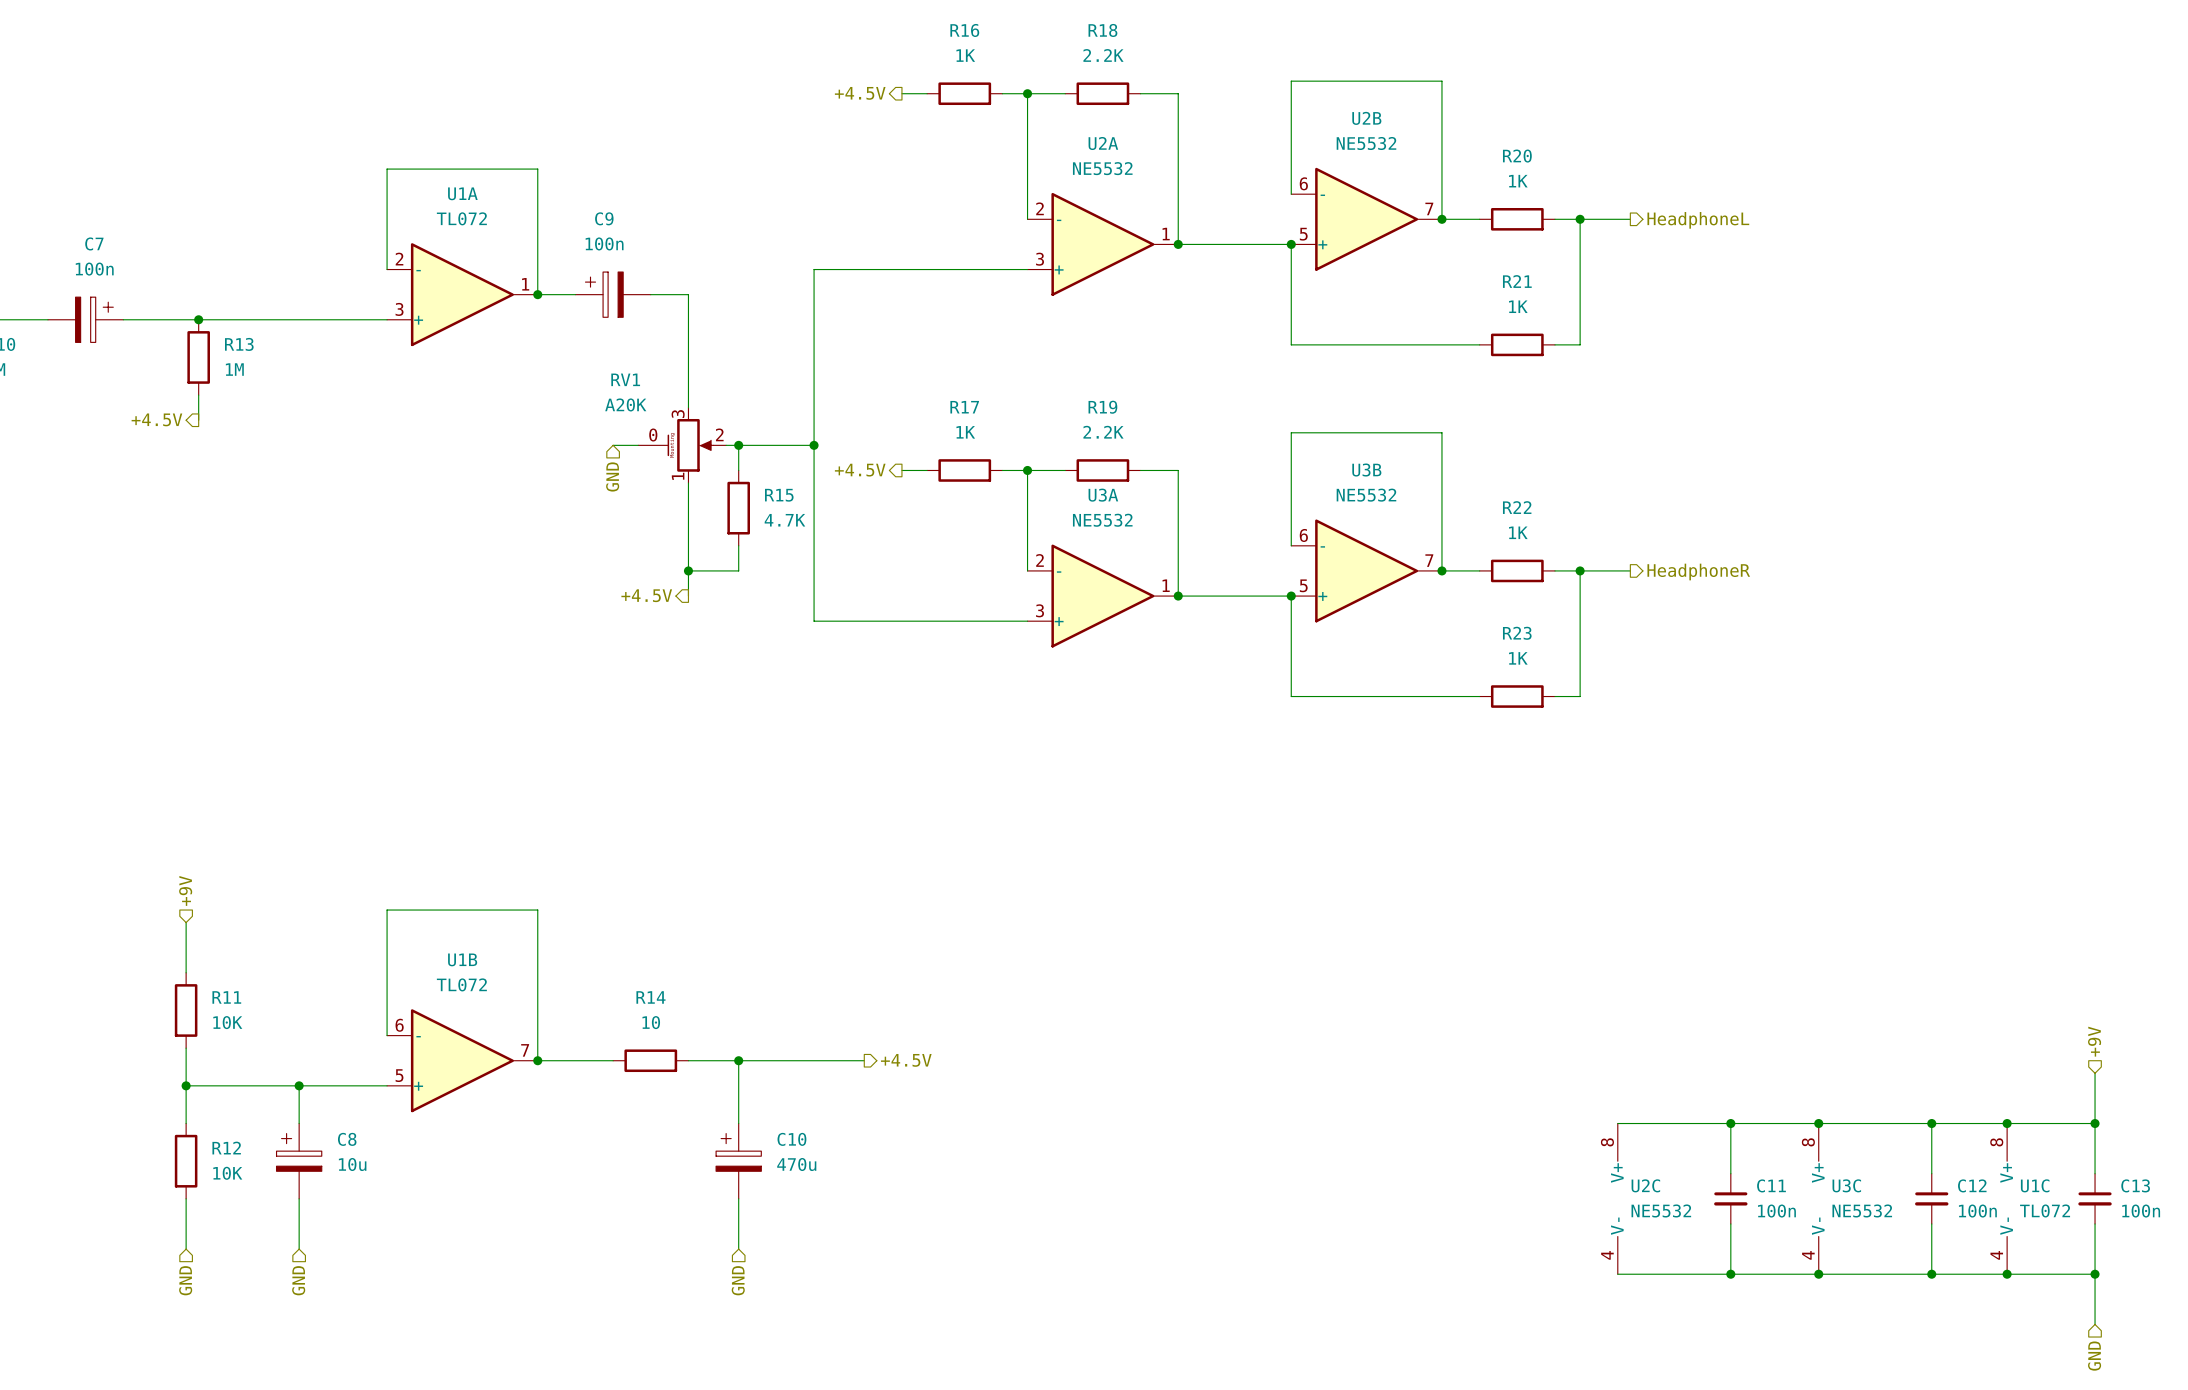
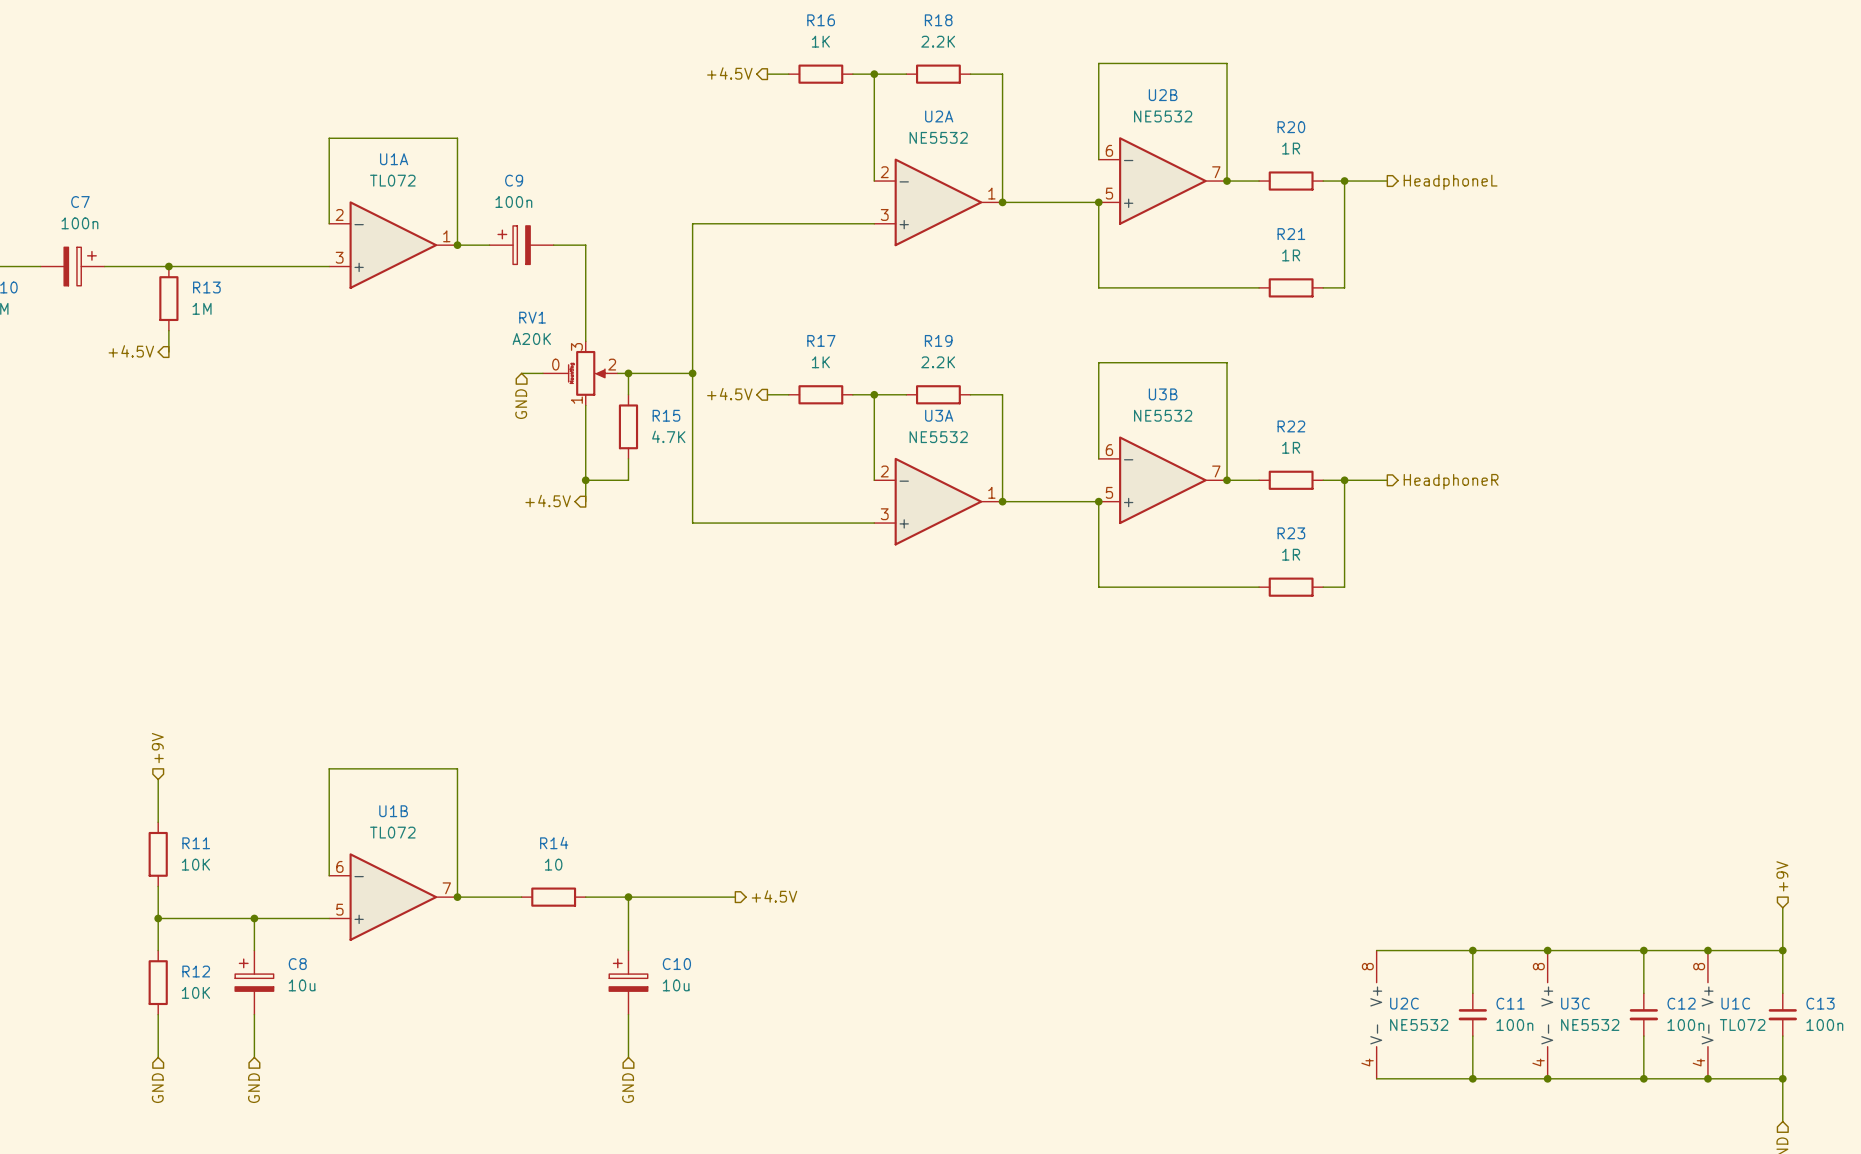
R20 value: 1K (1518, 181) -> 1R (1291, 148)
R21 value: 1K (1518, 306) -> 1R (1291, 255)
R22 value: 1K (1518, 532) -> 1R (1291, 447)
R23 value: 1K (1518, 658) -> 1R (1291, 554)
C10 value: 470u (796, 1164) -> 10u (676, 985)

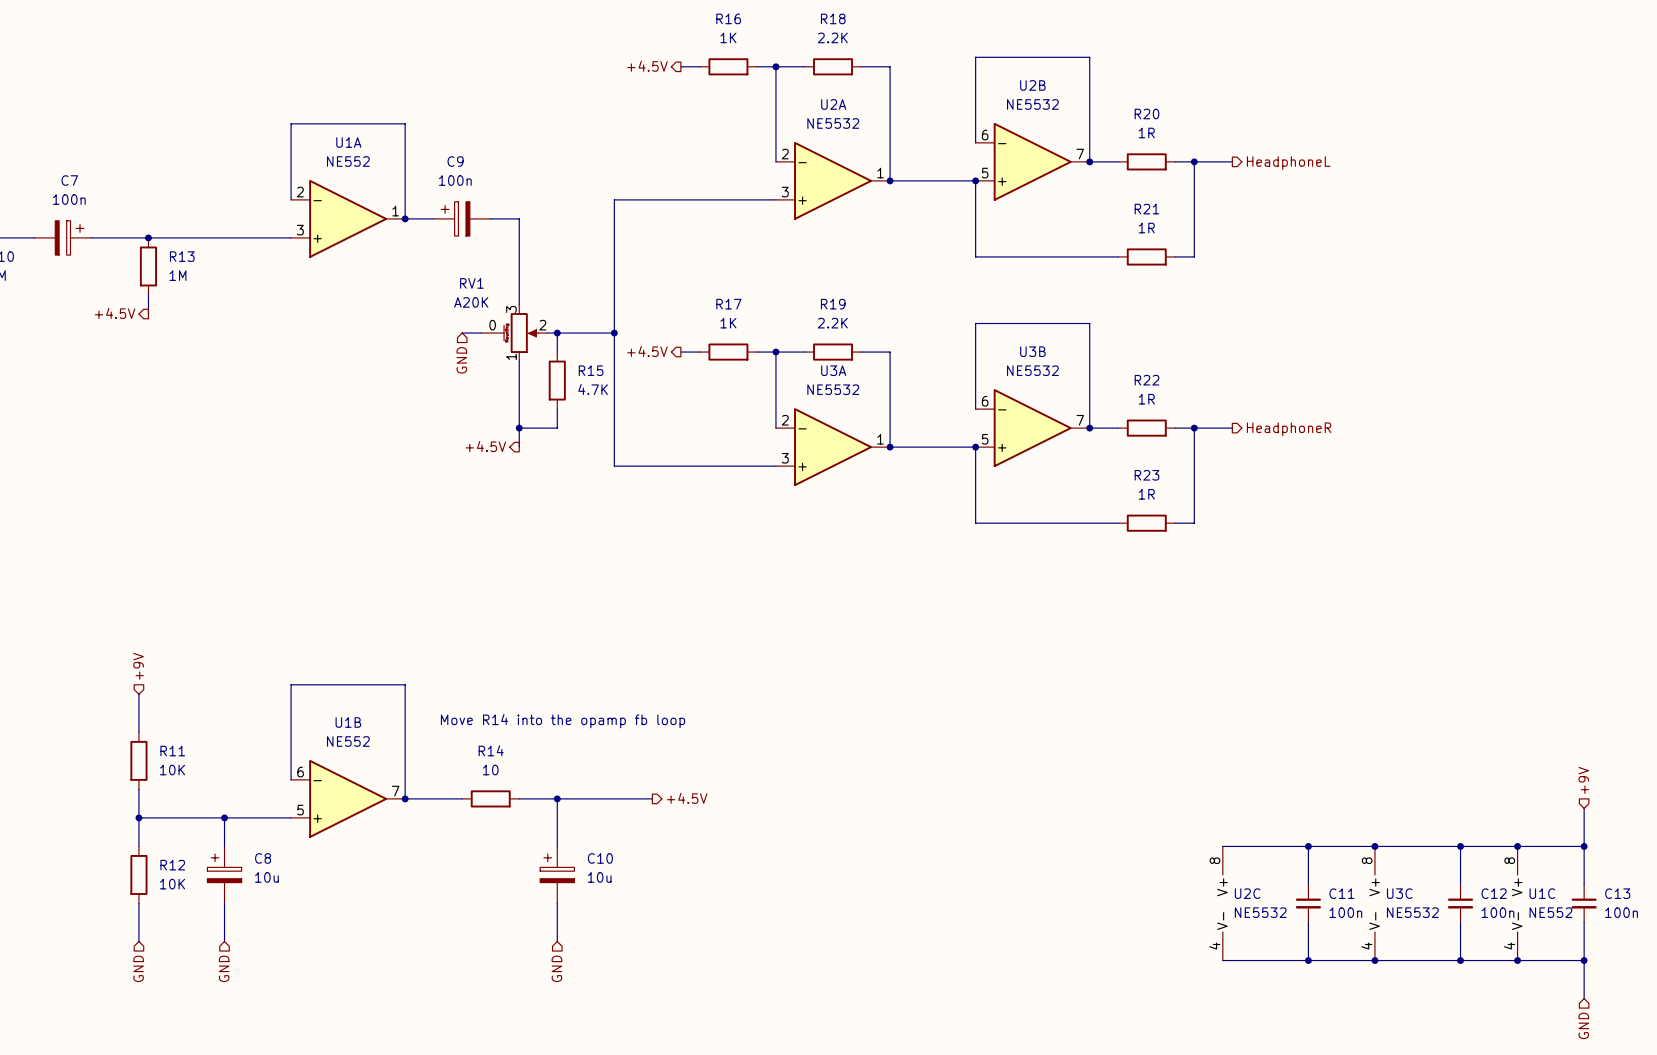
U1A value: TL072 (392, 180) -> NE552 (348, 161)
text: none -> Move R14 into the opamp fb loop (563, 721)
U1B value: TL072 (392, 832) -> NE552 (348, 741)
U1C value: TL072 (1742, 1024) -> NE552 (1550, 912)

